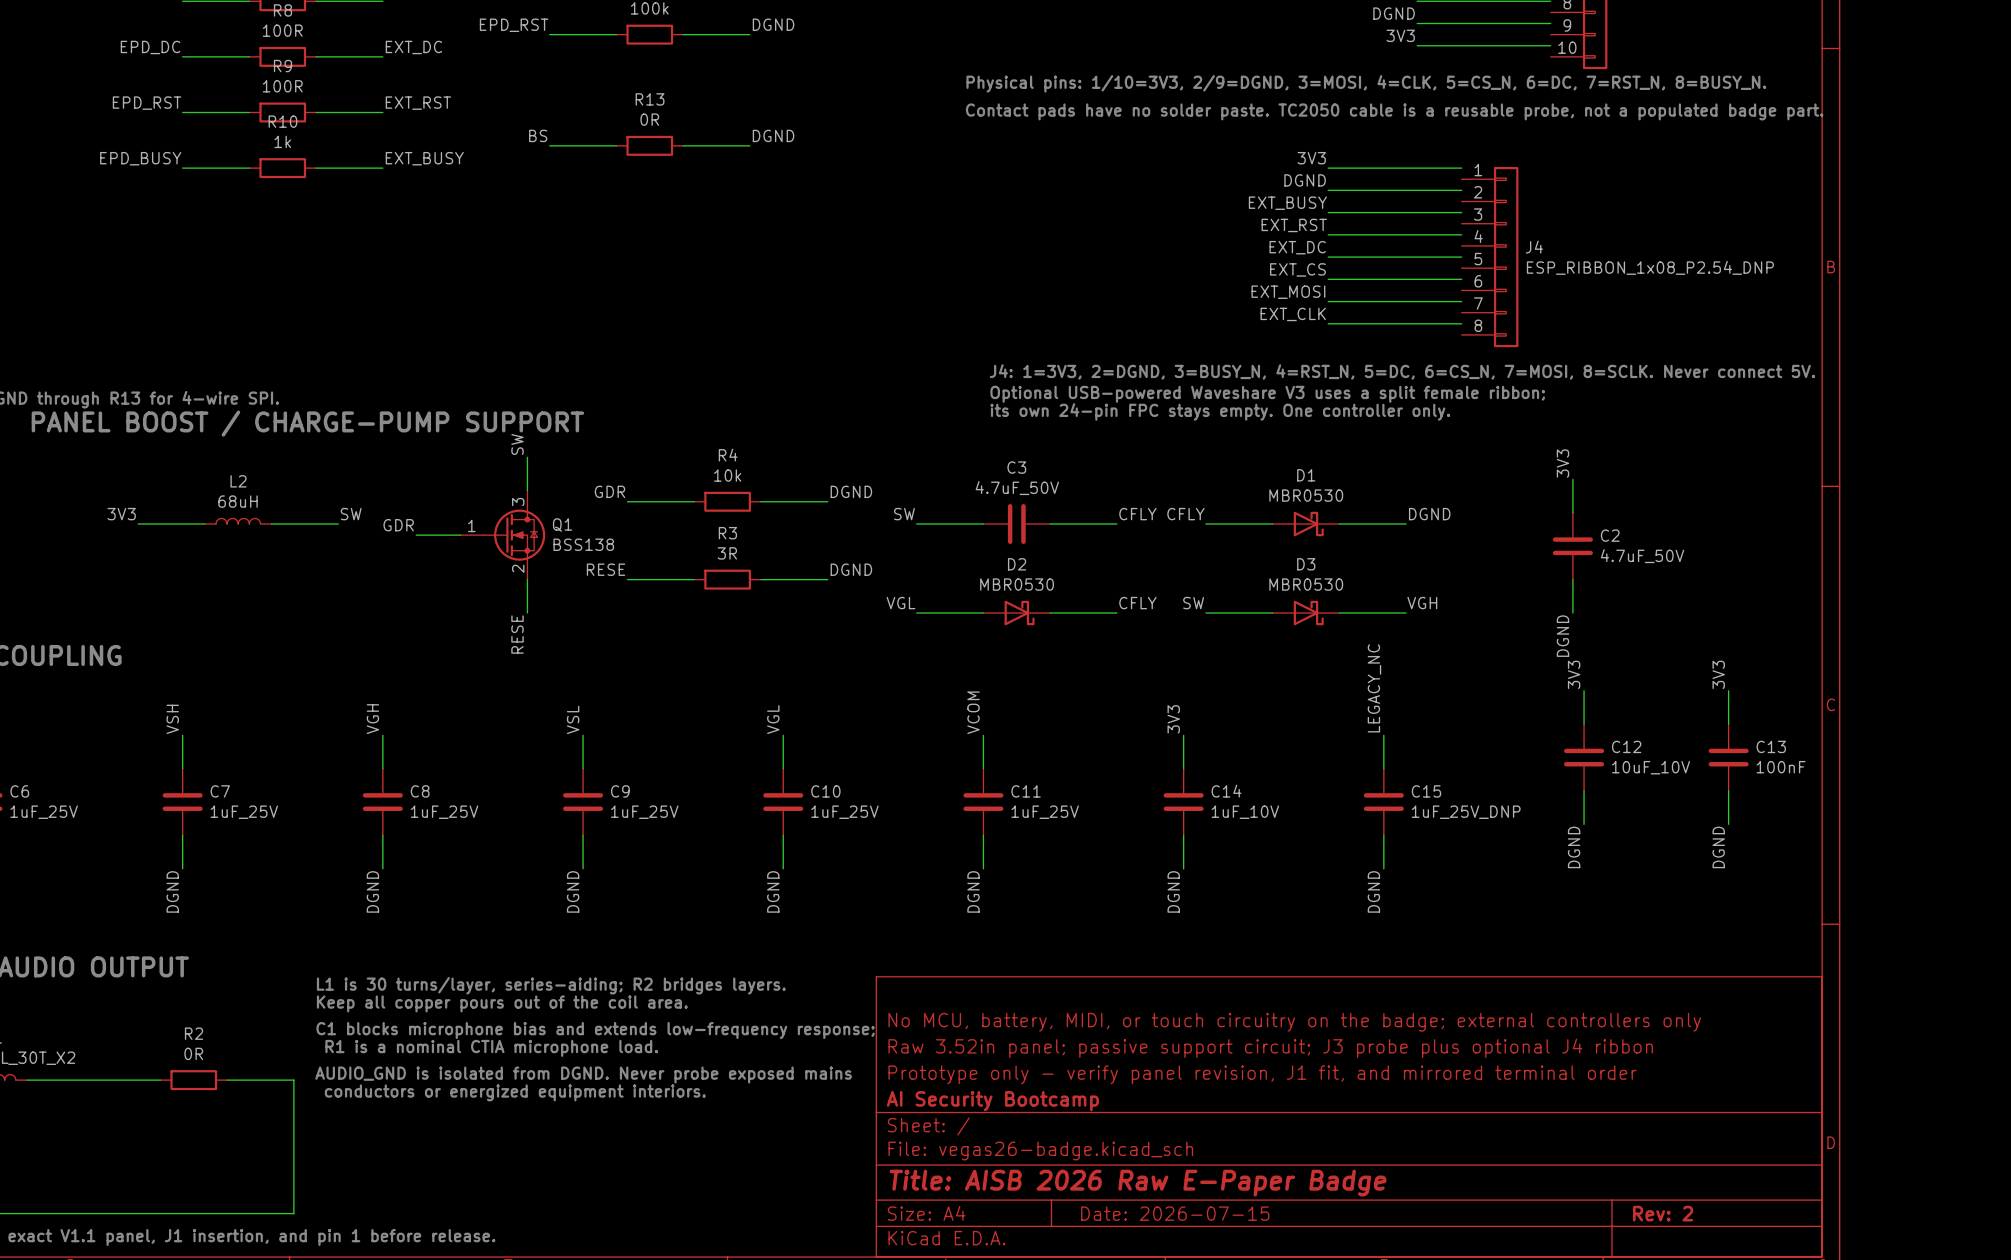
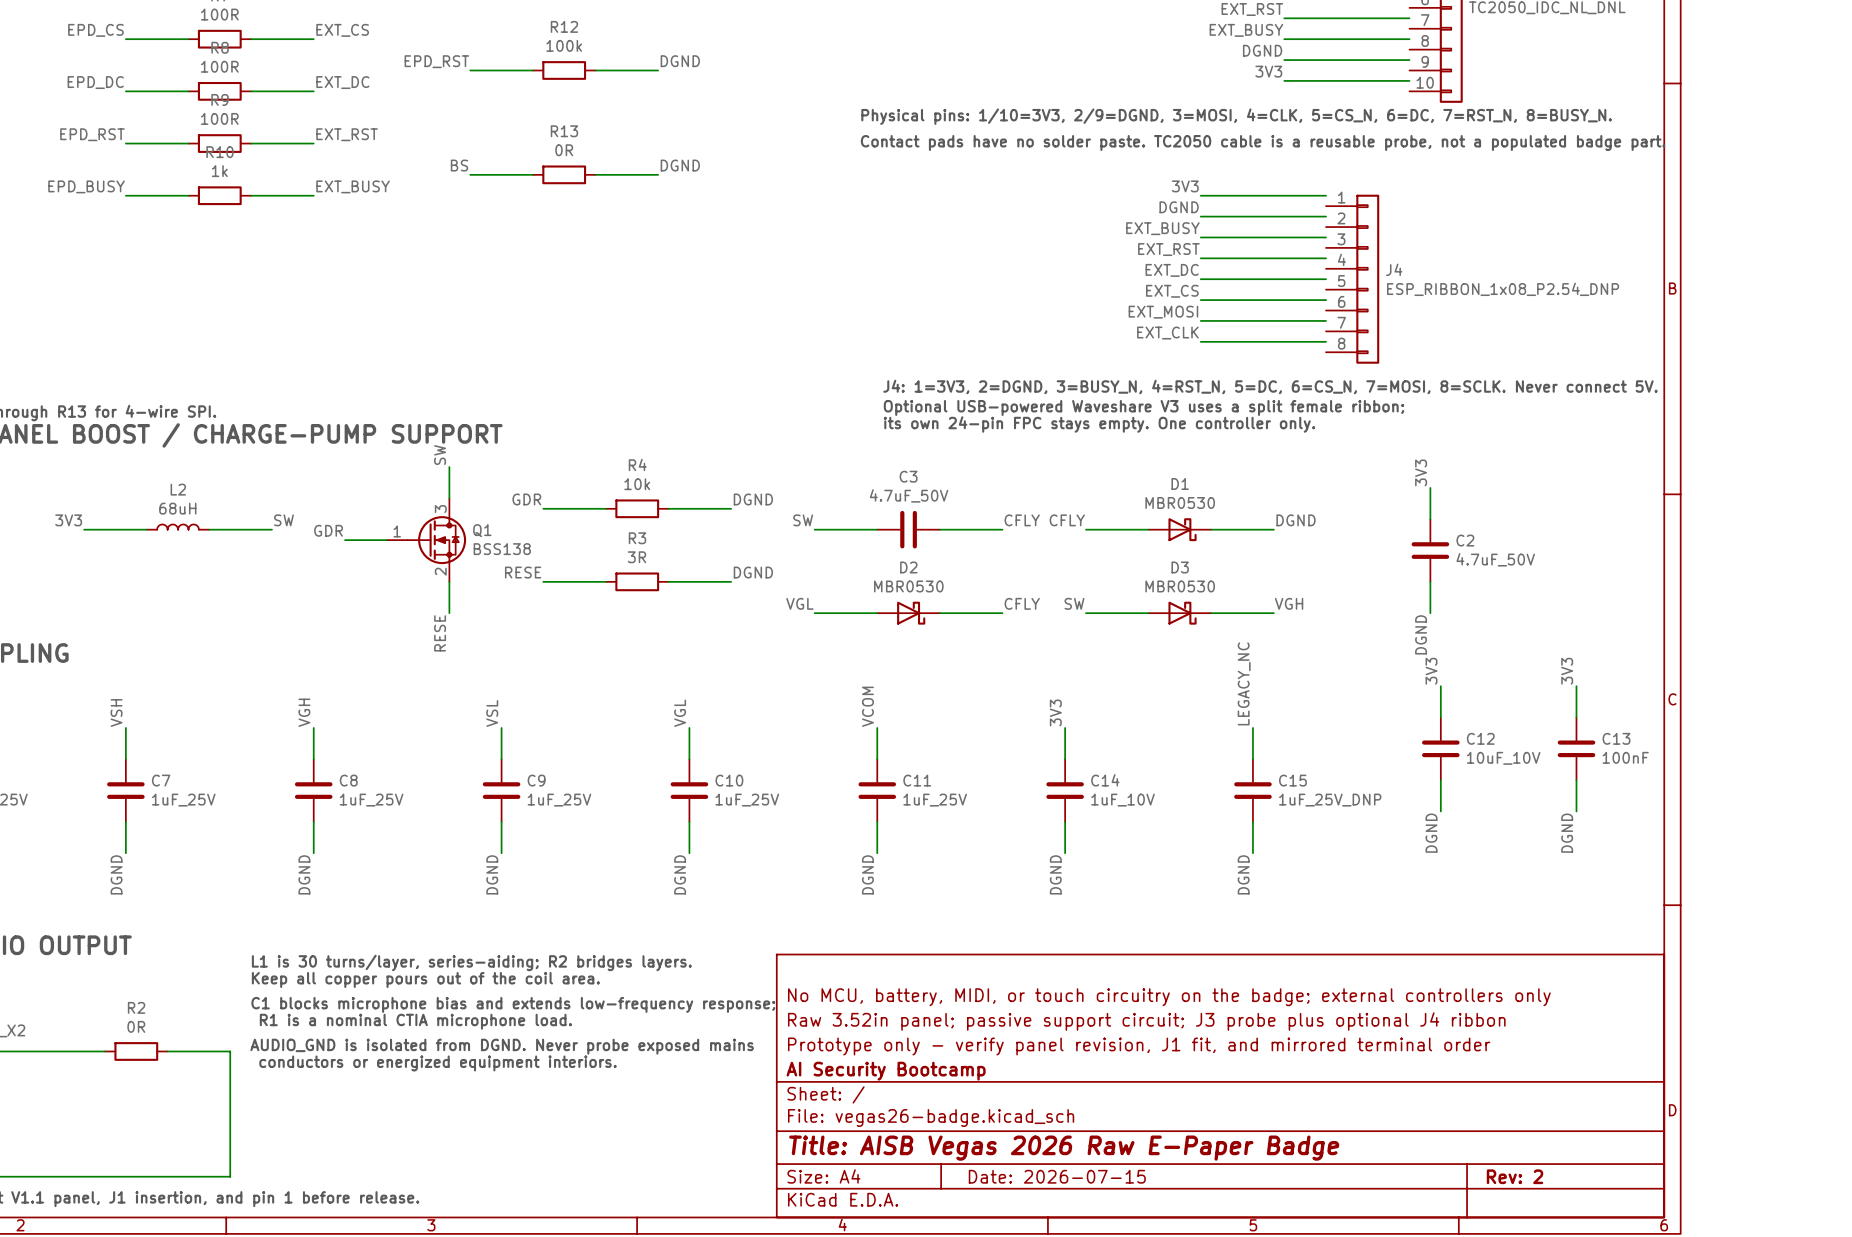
title block: Title: AISB 2026 Raw E-Paper Badge (1138, 1183) -> Title: AISB Vegas 2026 Raw E-Paper Badge (1064, 1148)

